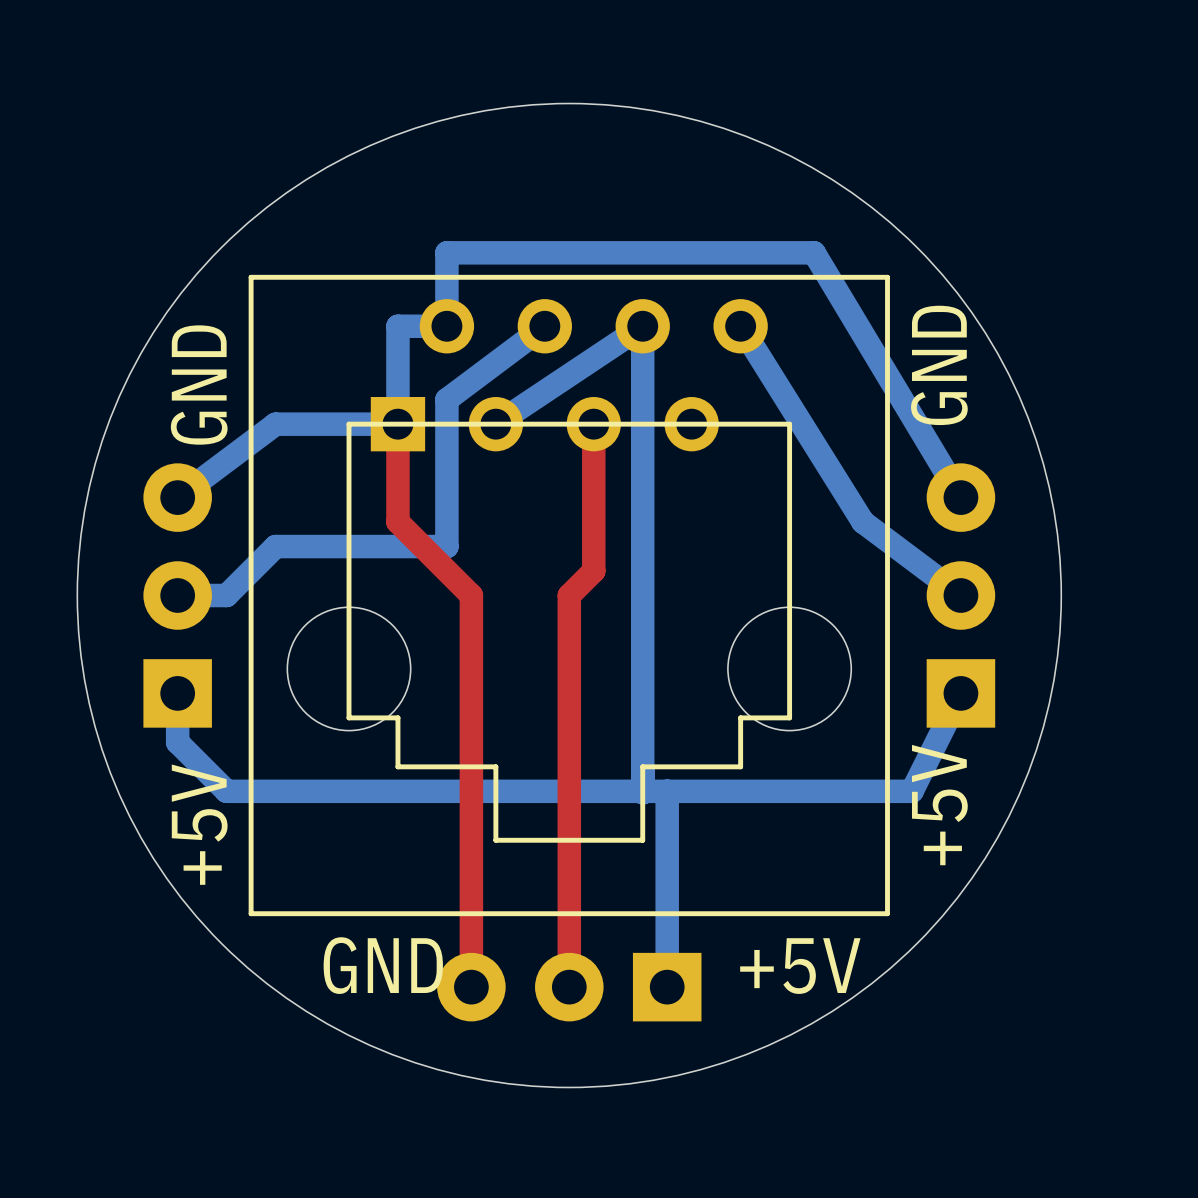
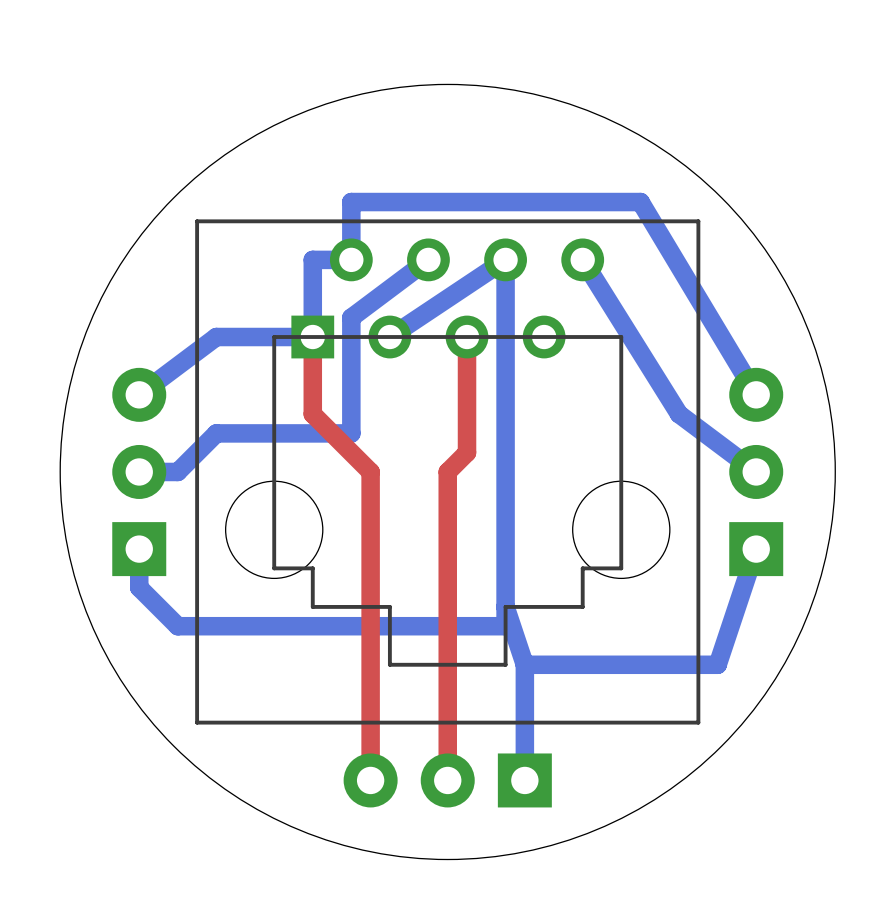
text: GND (939, 365) -> none
text: GND (199, 385) -> none
bottom track: (960, 693) (911, 791) (642, 792) (642, 766) -> (756, 549) (717, 664) (524, 664) (505, 606)
bottom track: (667, 791) (667, 840) -> none
text: +5V (939, 805) -> none
text: +5V (199, 824) -> none
text: GND (383, 965) -> none
text: +5V (800, 966) -> none

